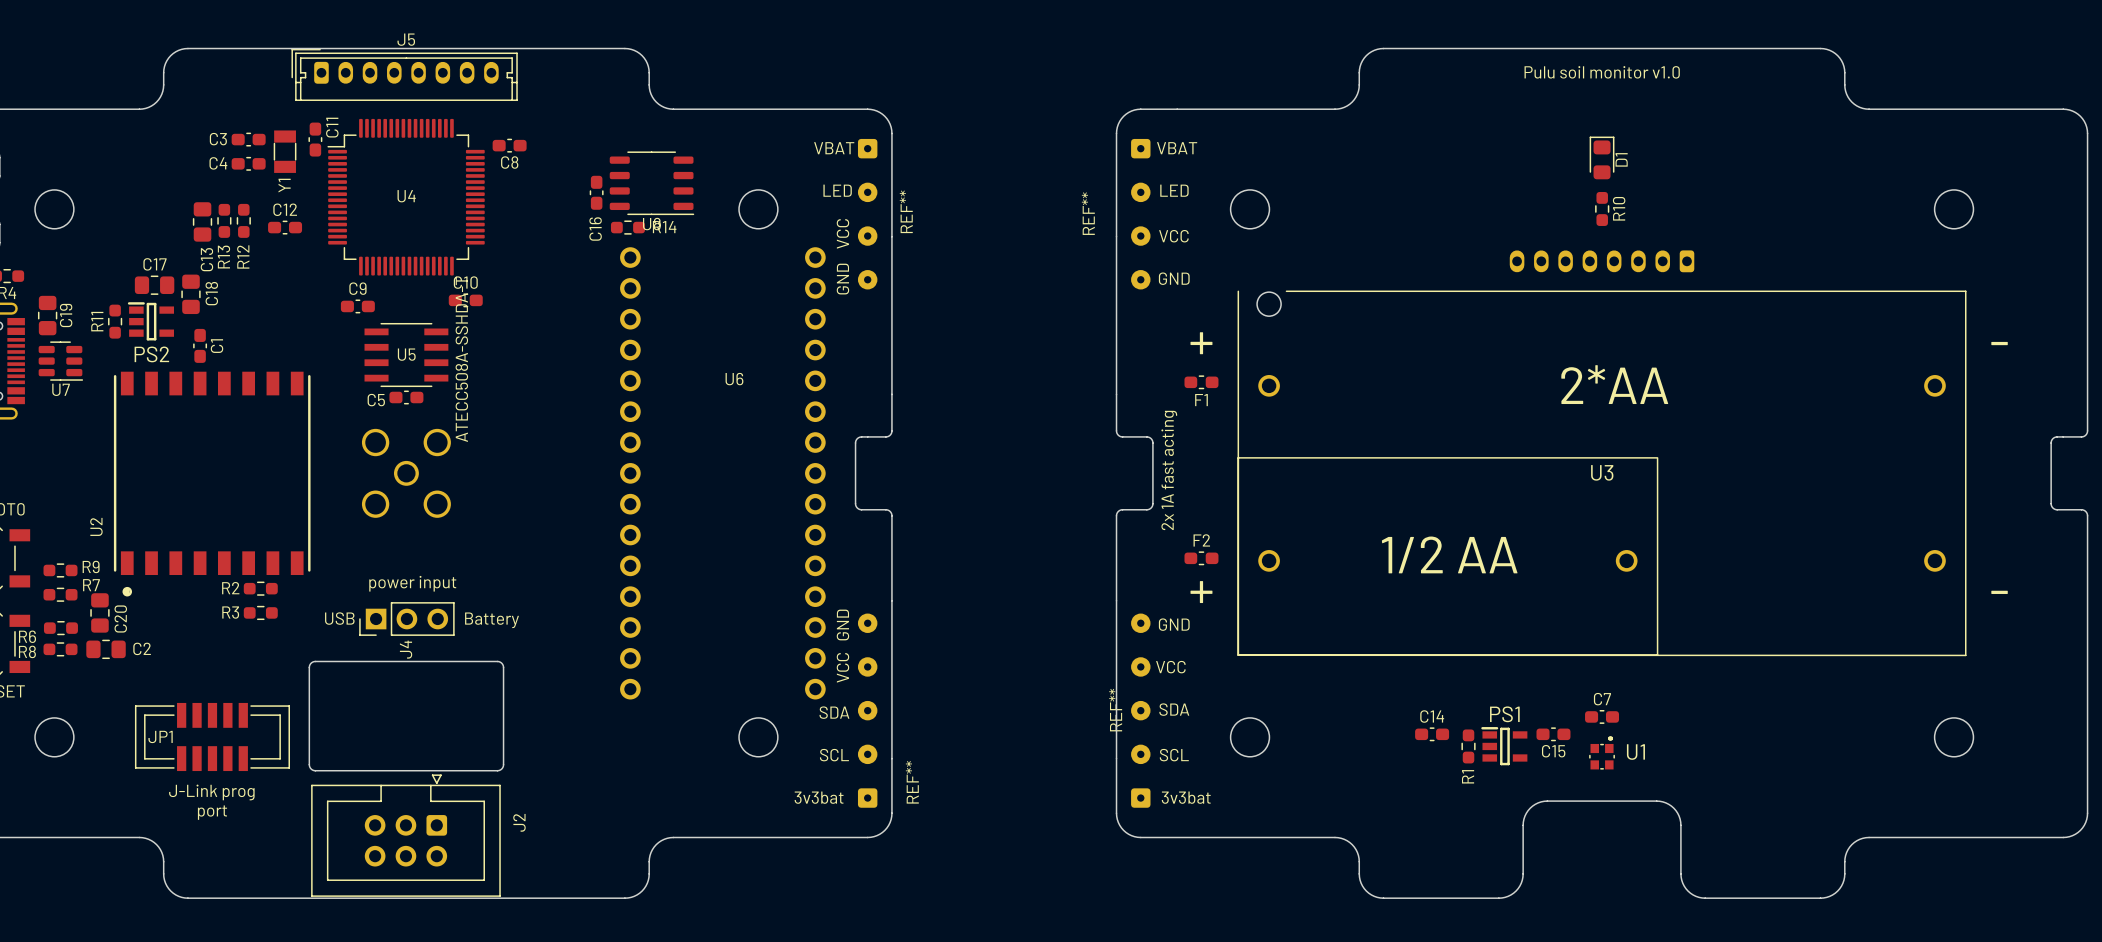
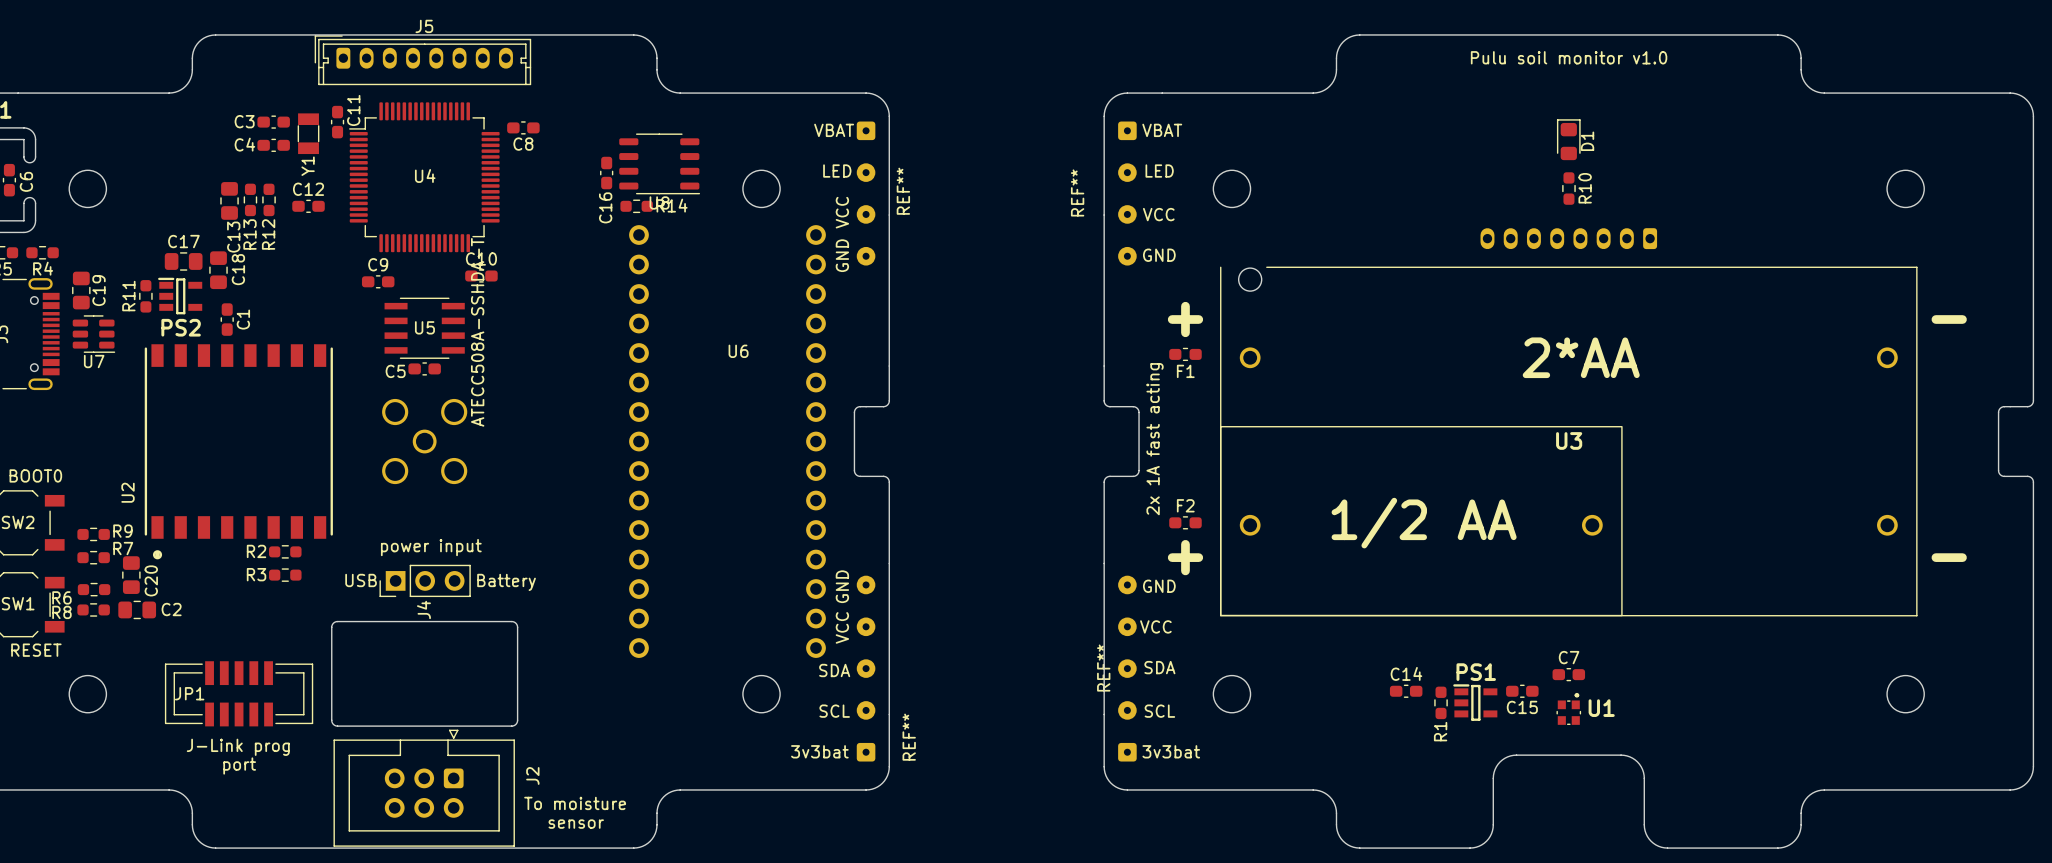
text: none -> To moisture (575, 803)
text: none -> sensor (576, 824)

